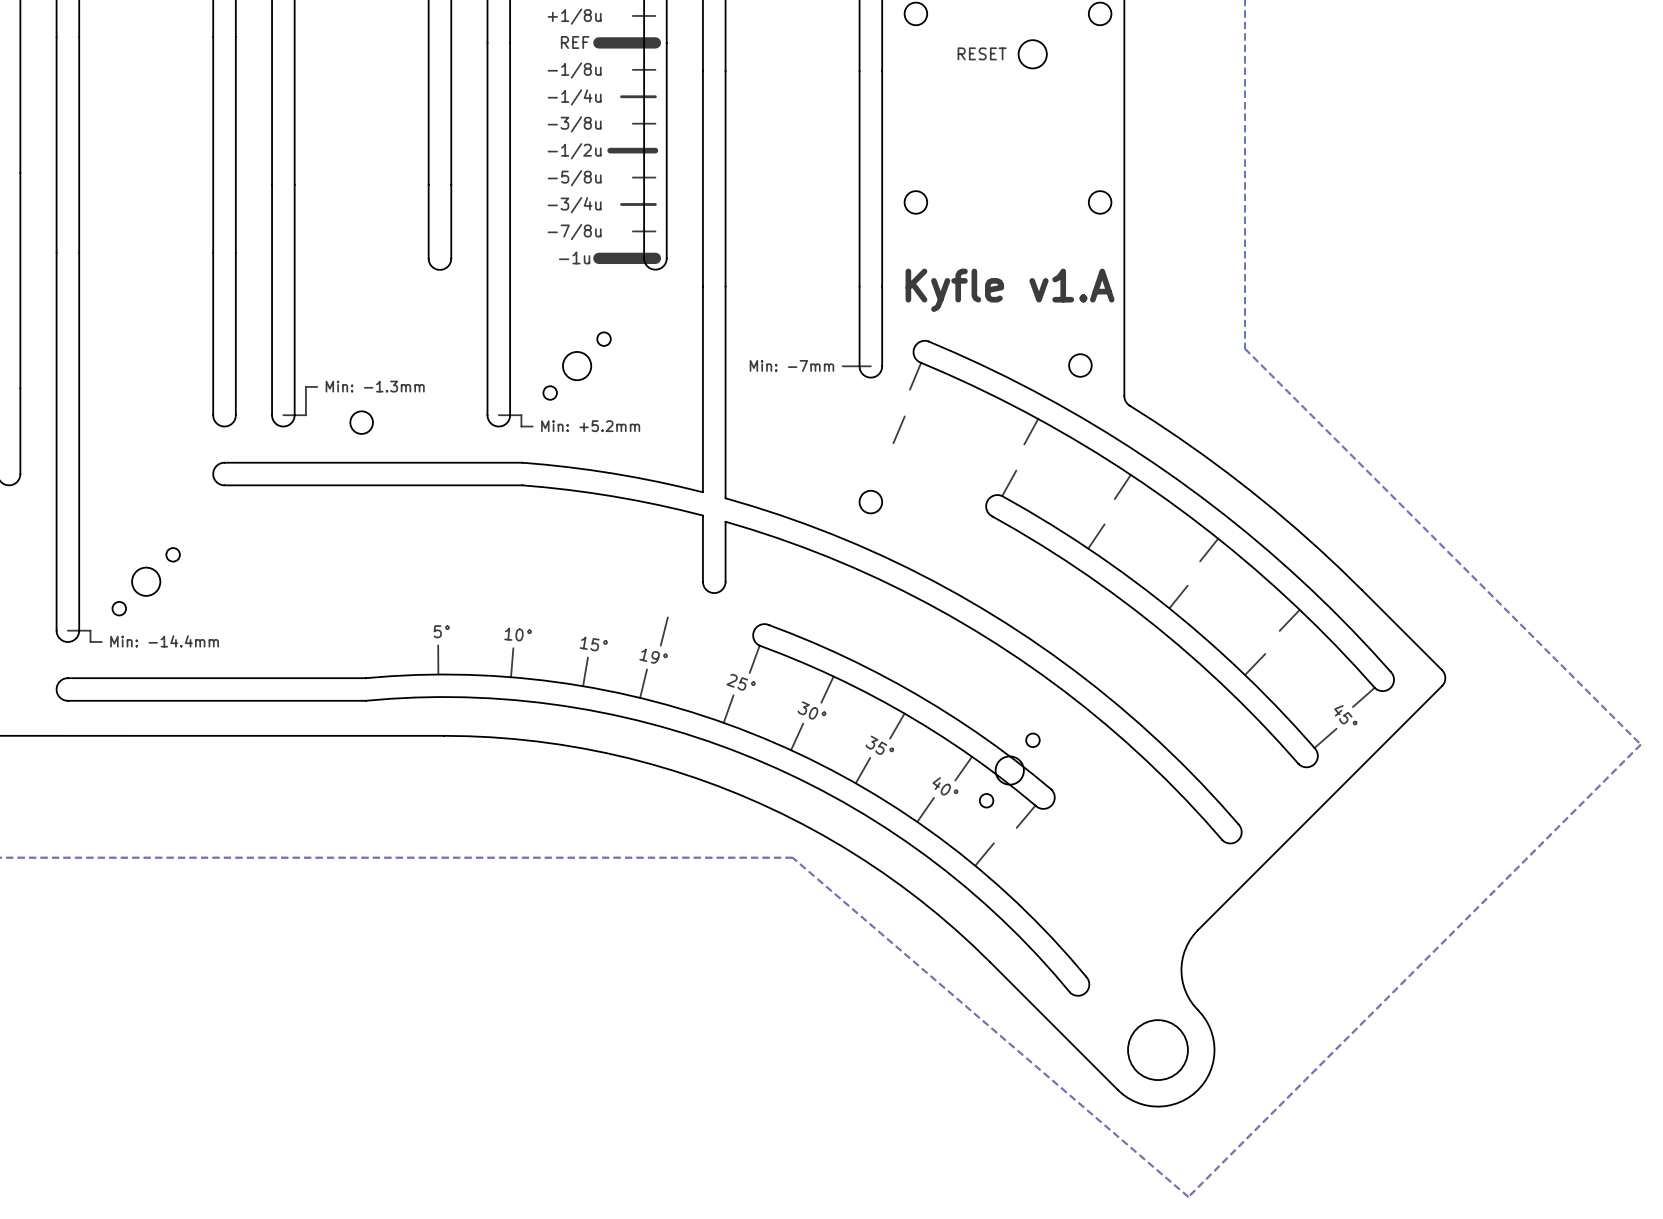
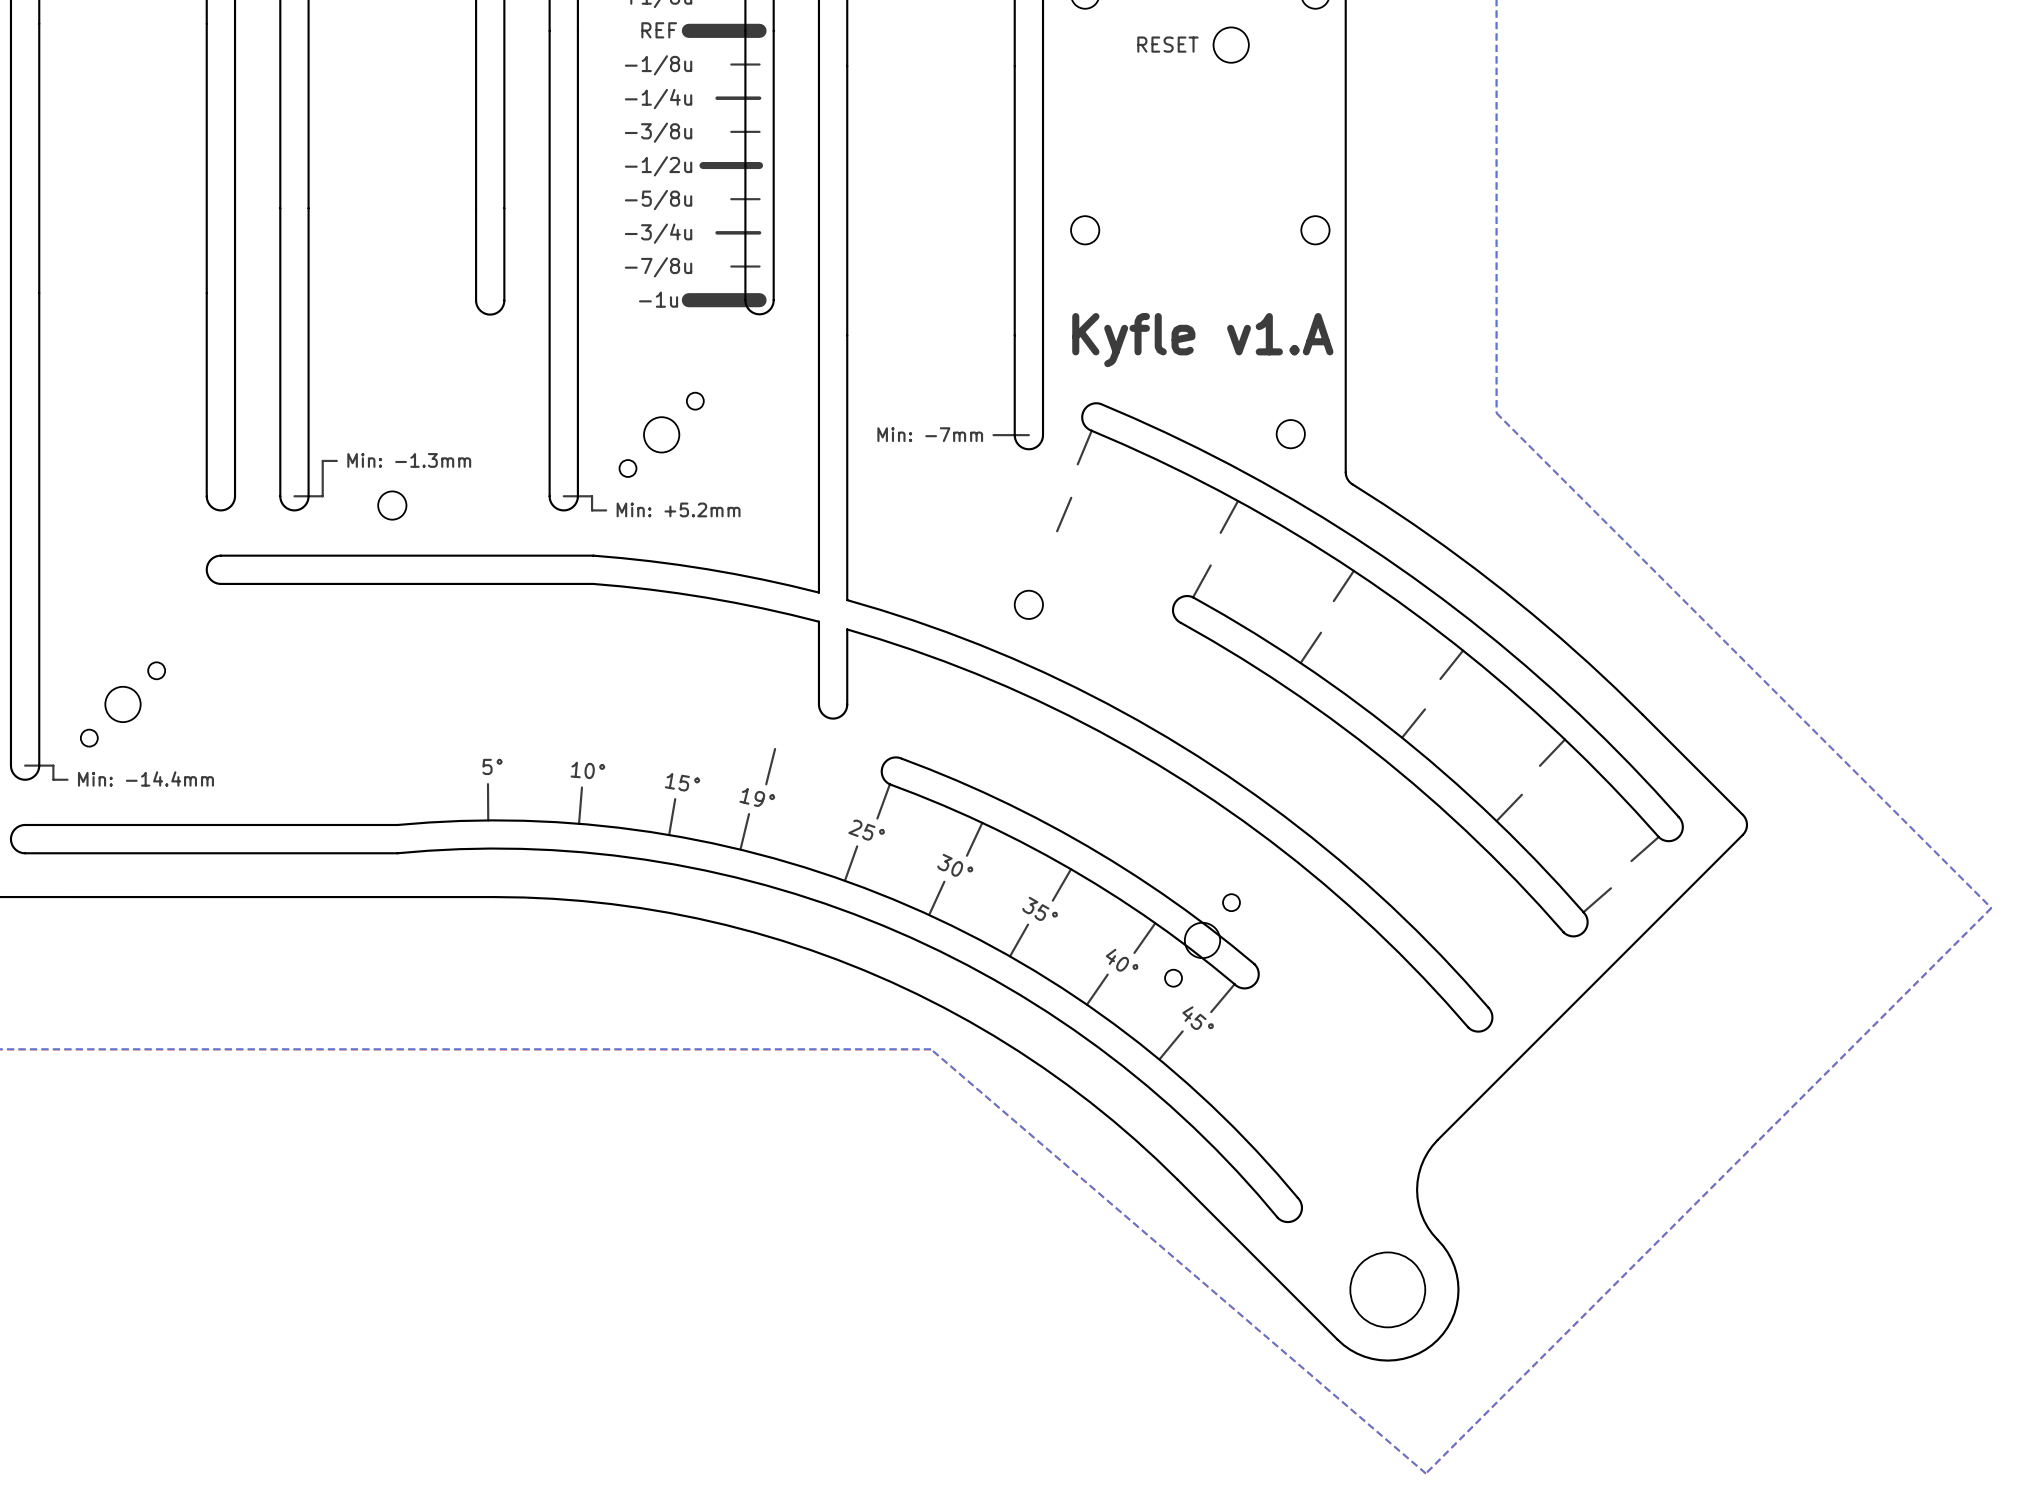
drawing shape: [974, 686, 1376, 867] -> [1158, 835, 1660, 1061]

